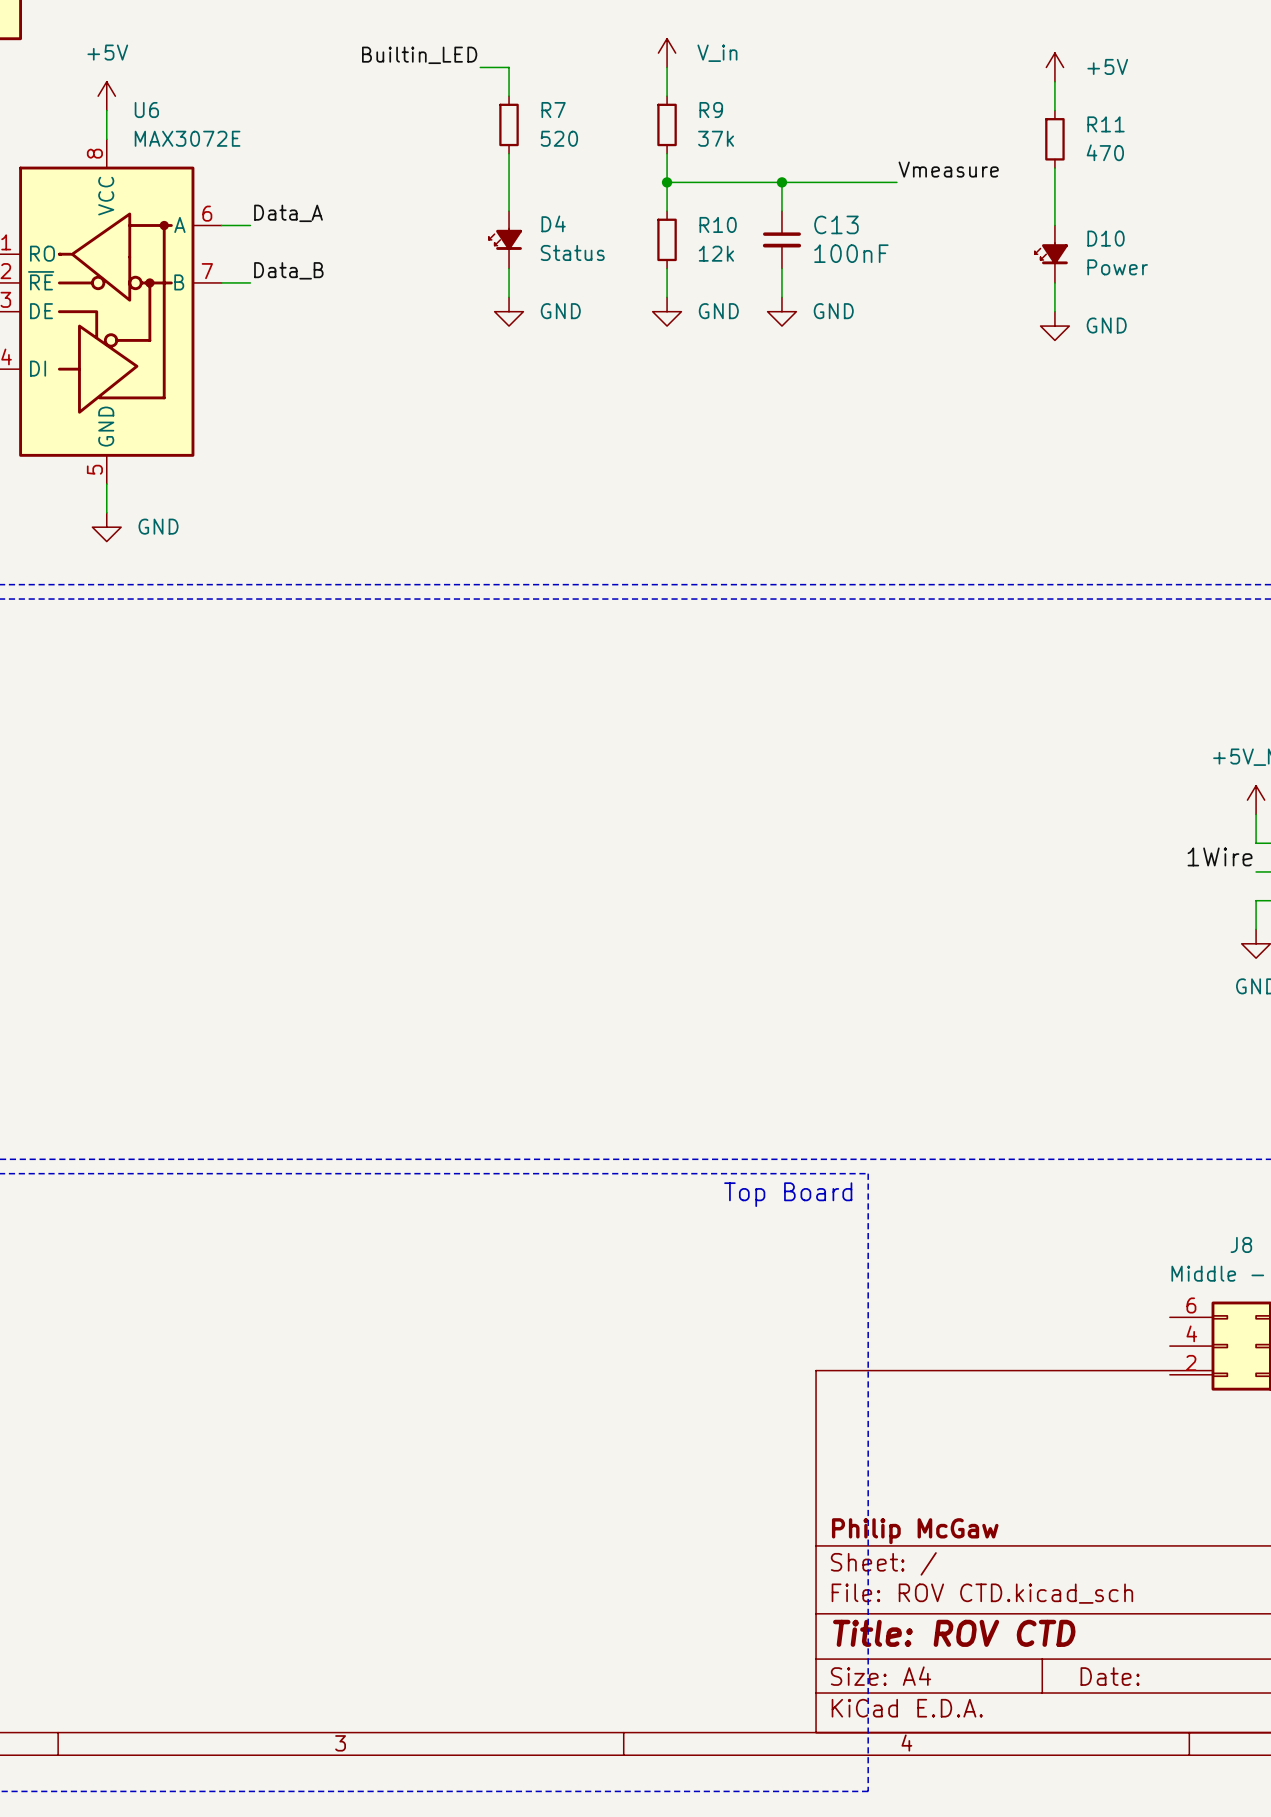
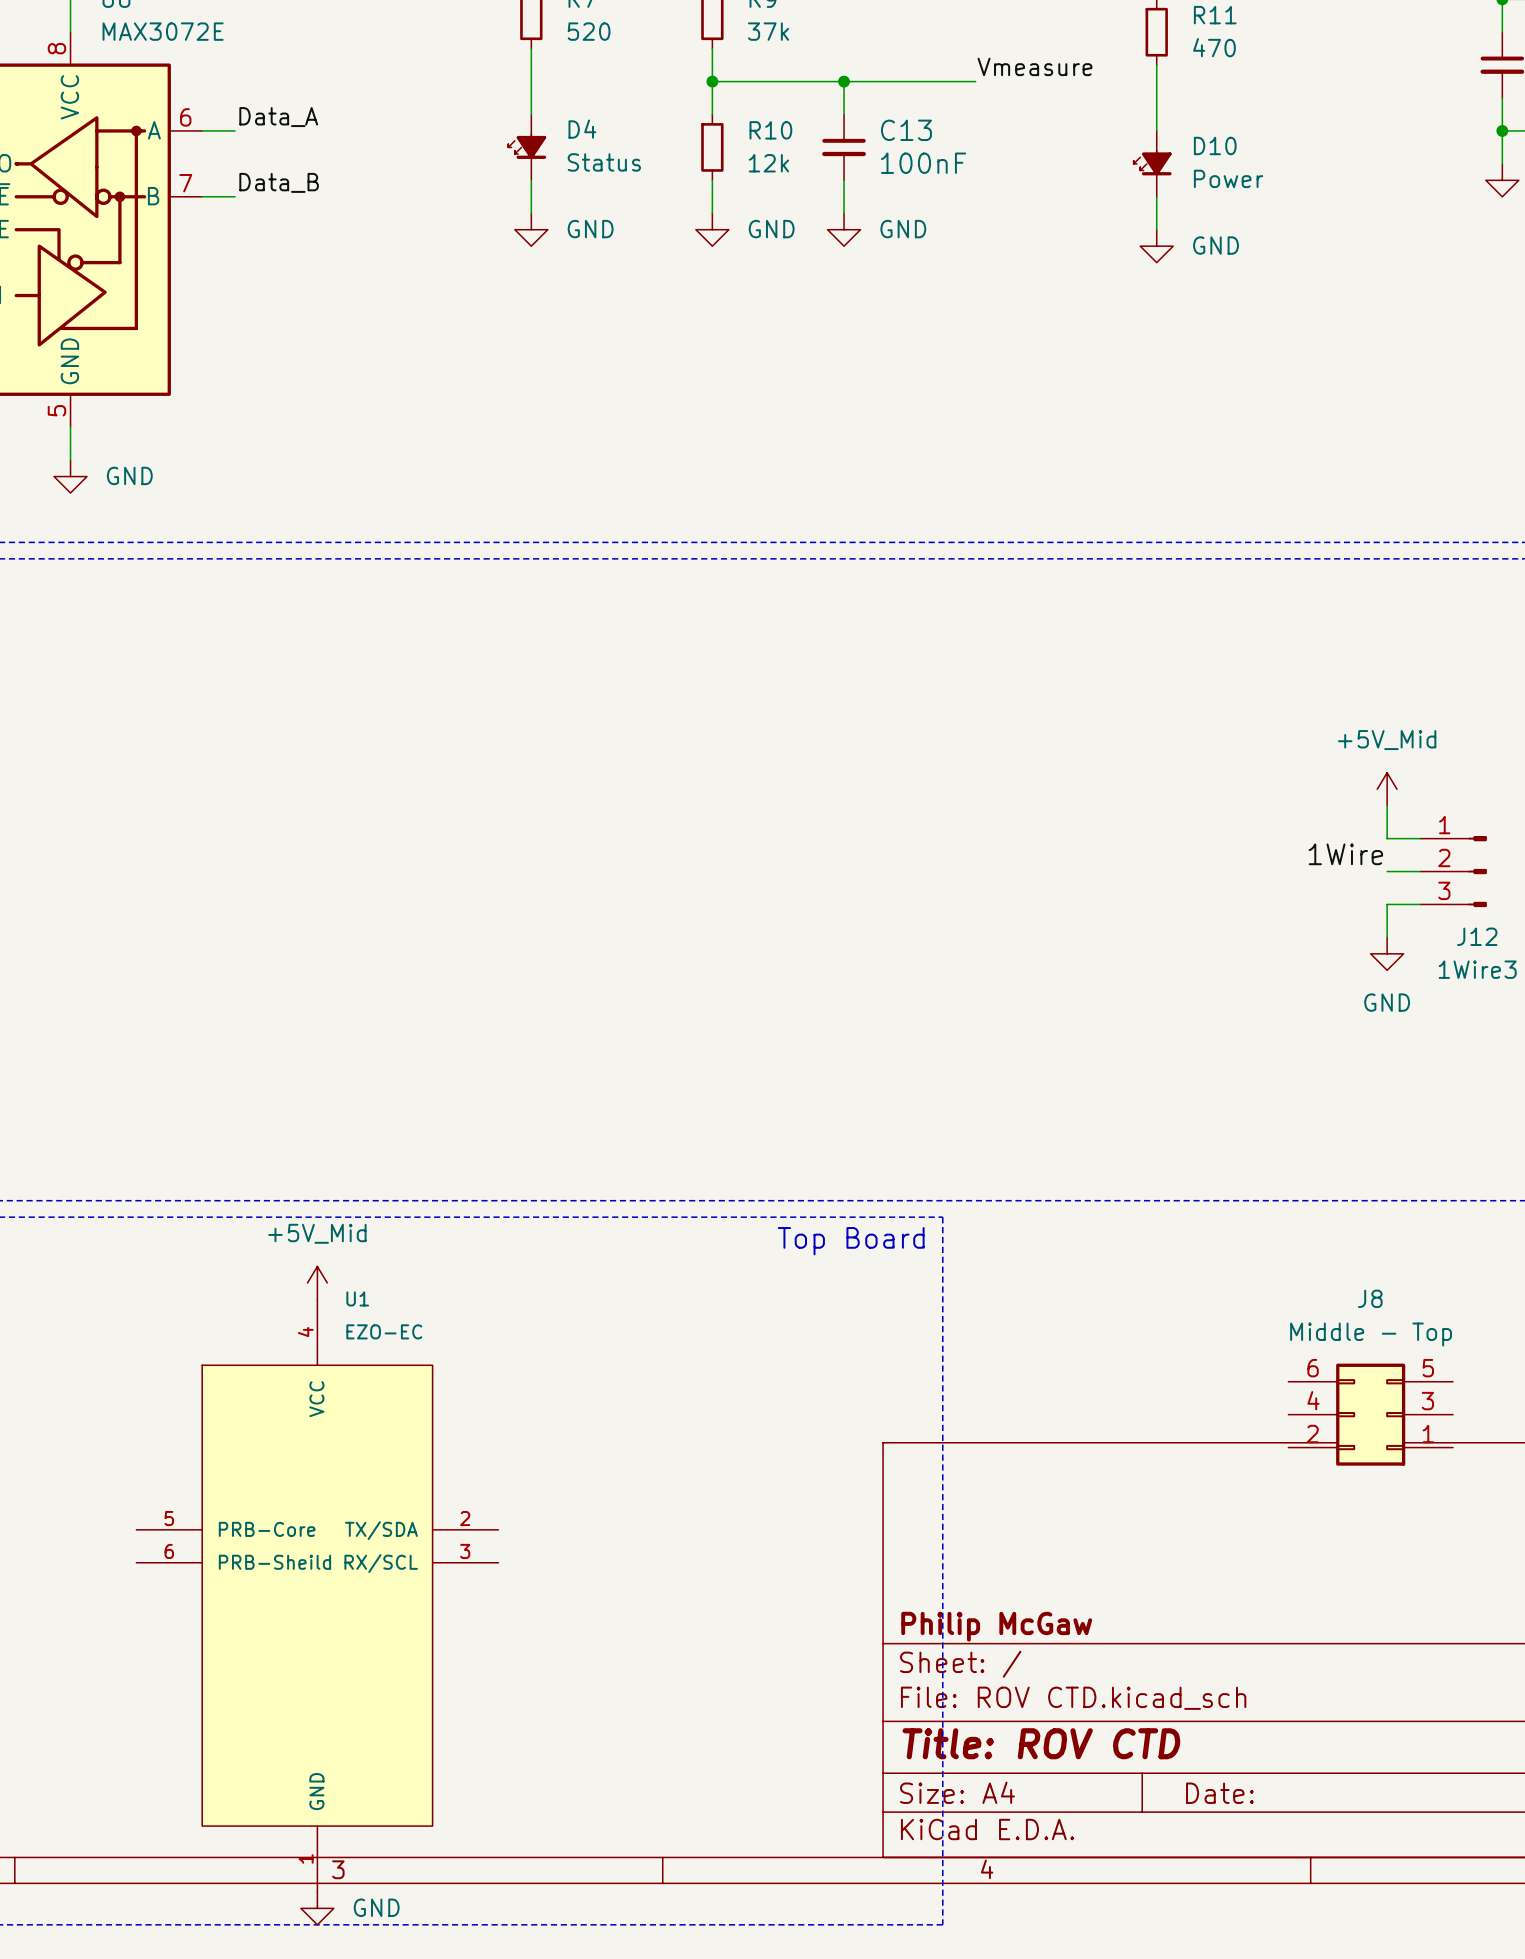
power symbol: none -> +5V_Mid (317, 1282)
U1: none -> EZO-EC (317, 1595)
power symbol: none -> GND (317, 1908)

